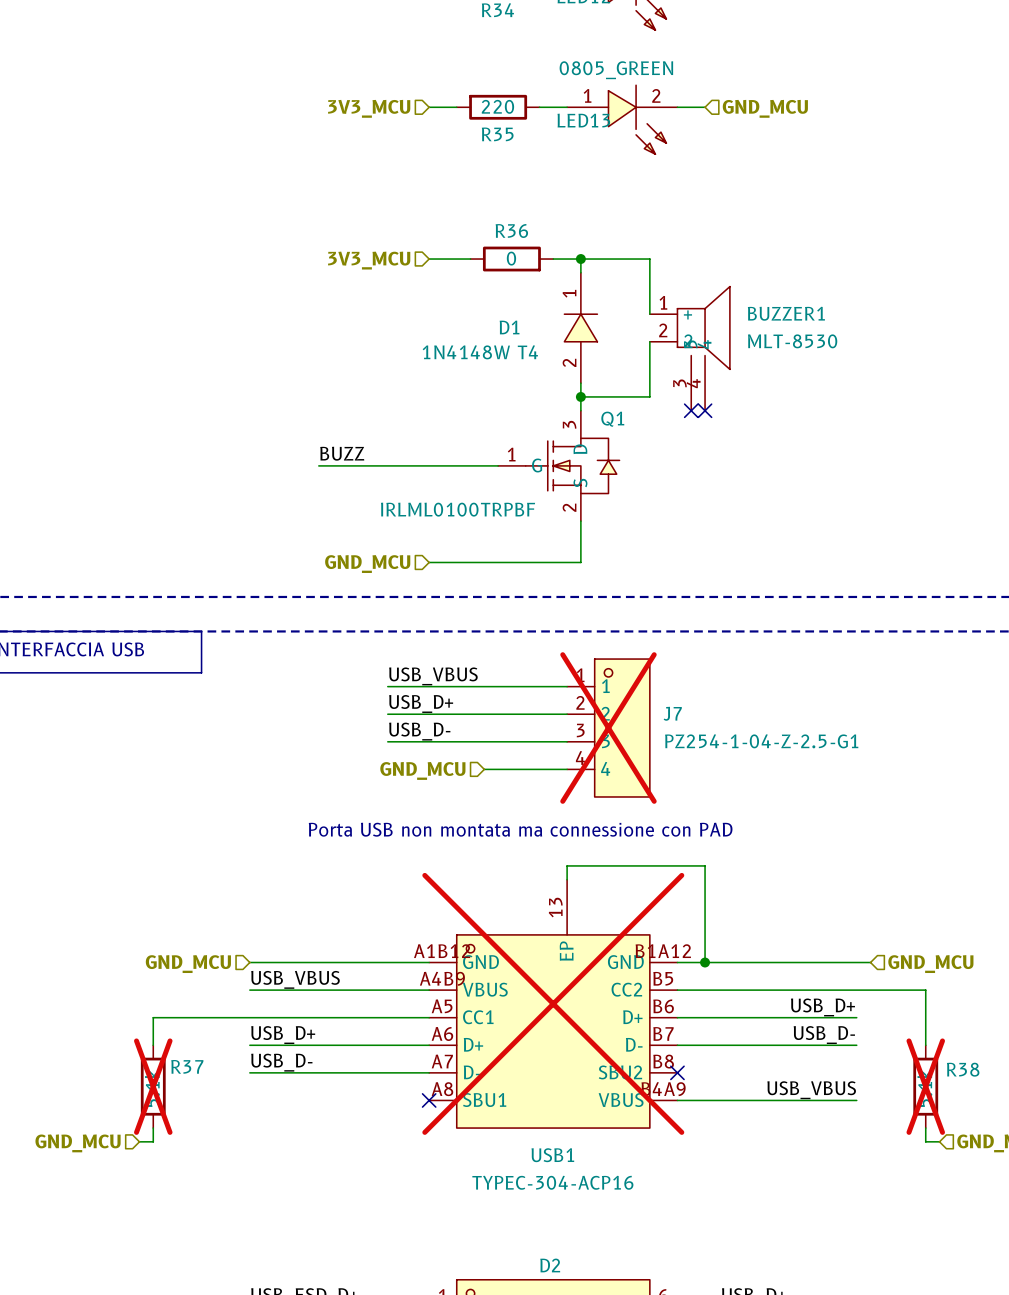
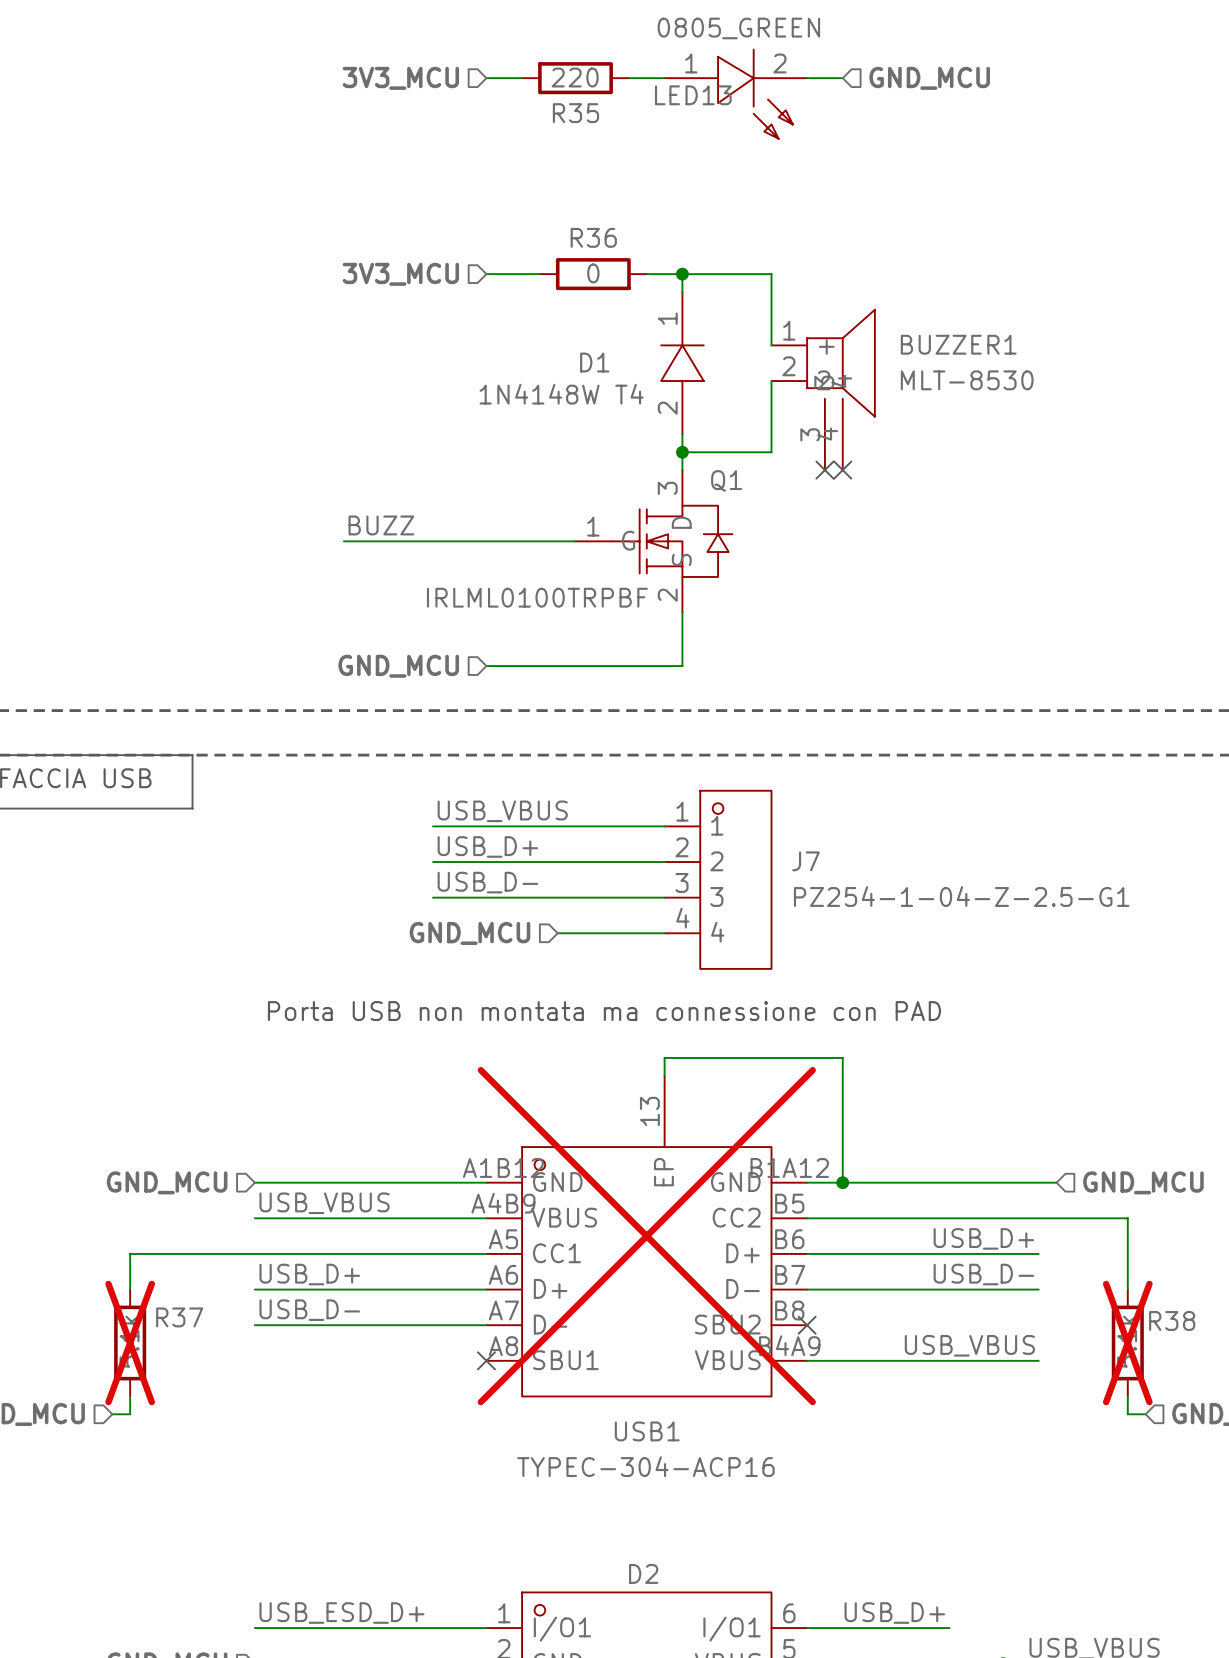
J7 do-not-place cross: (608, 728) -> none

